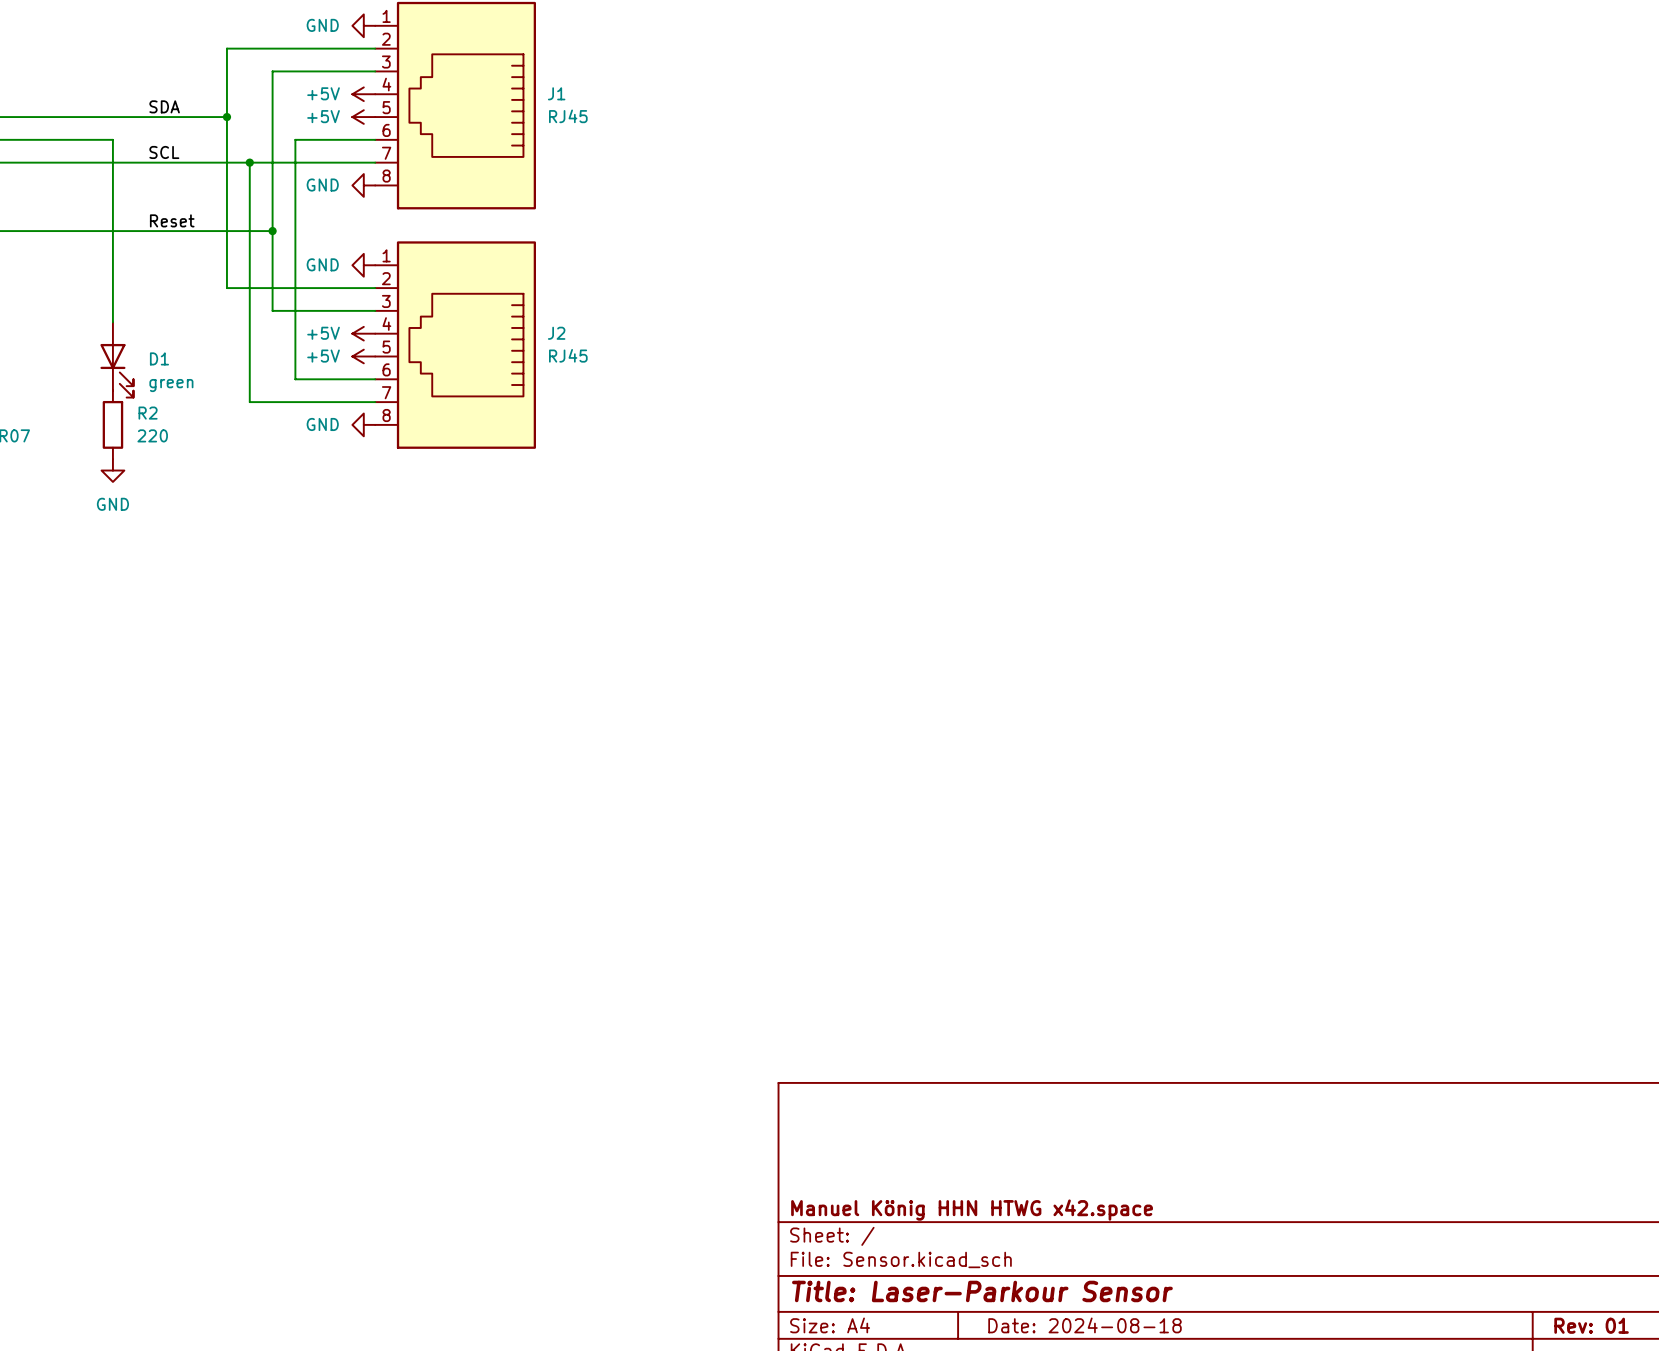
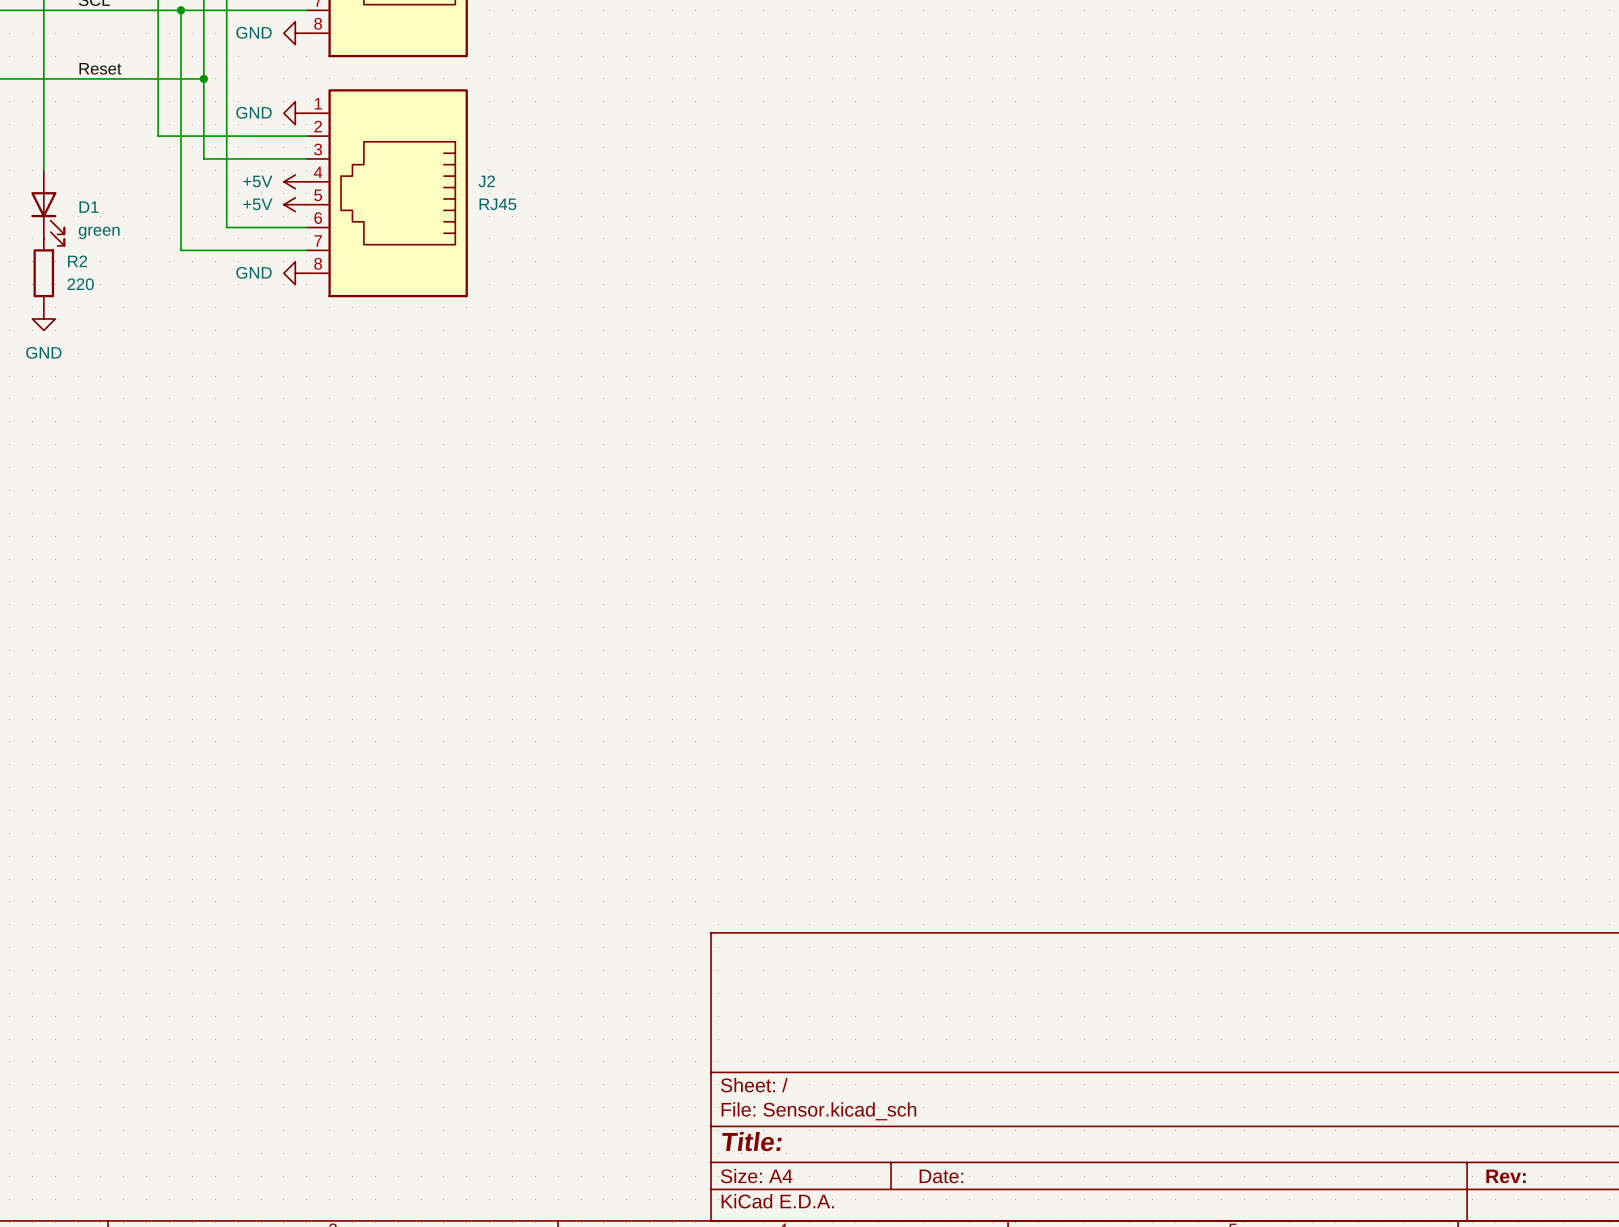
title block: Manuel König HHN HTWG x42.space (972, 1210) -> none
title block: Title: Laser-Parkour Sensor (982, 1291) -> Title: (751, 1141)
title block: Date: 2024-08-18 (1085, 1325) -> Date: (941, 1176)
title block: Rev: 01 (1591, 1325) -> Rev: (1506, 1176)

